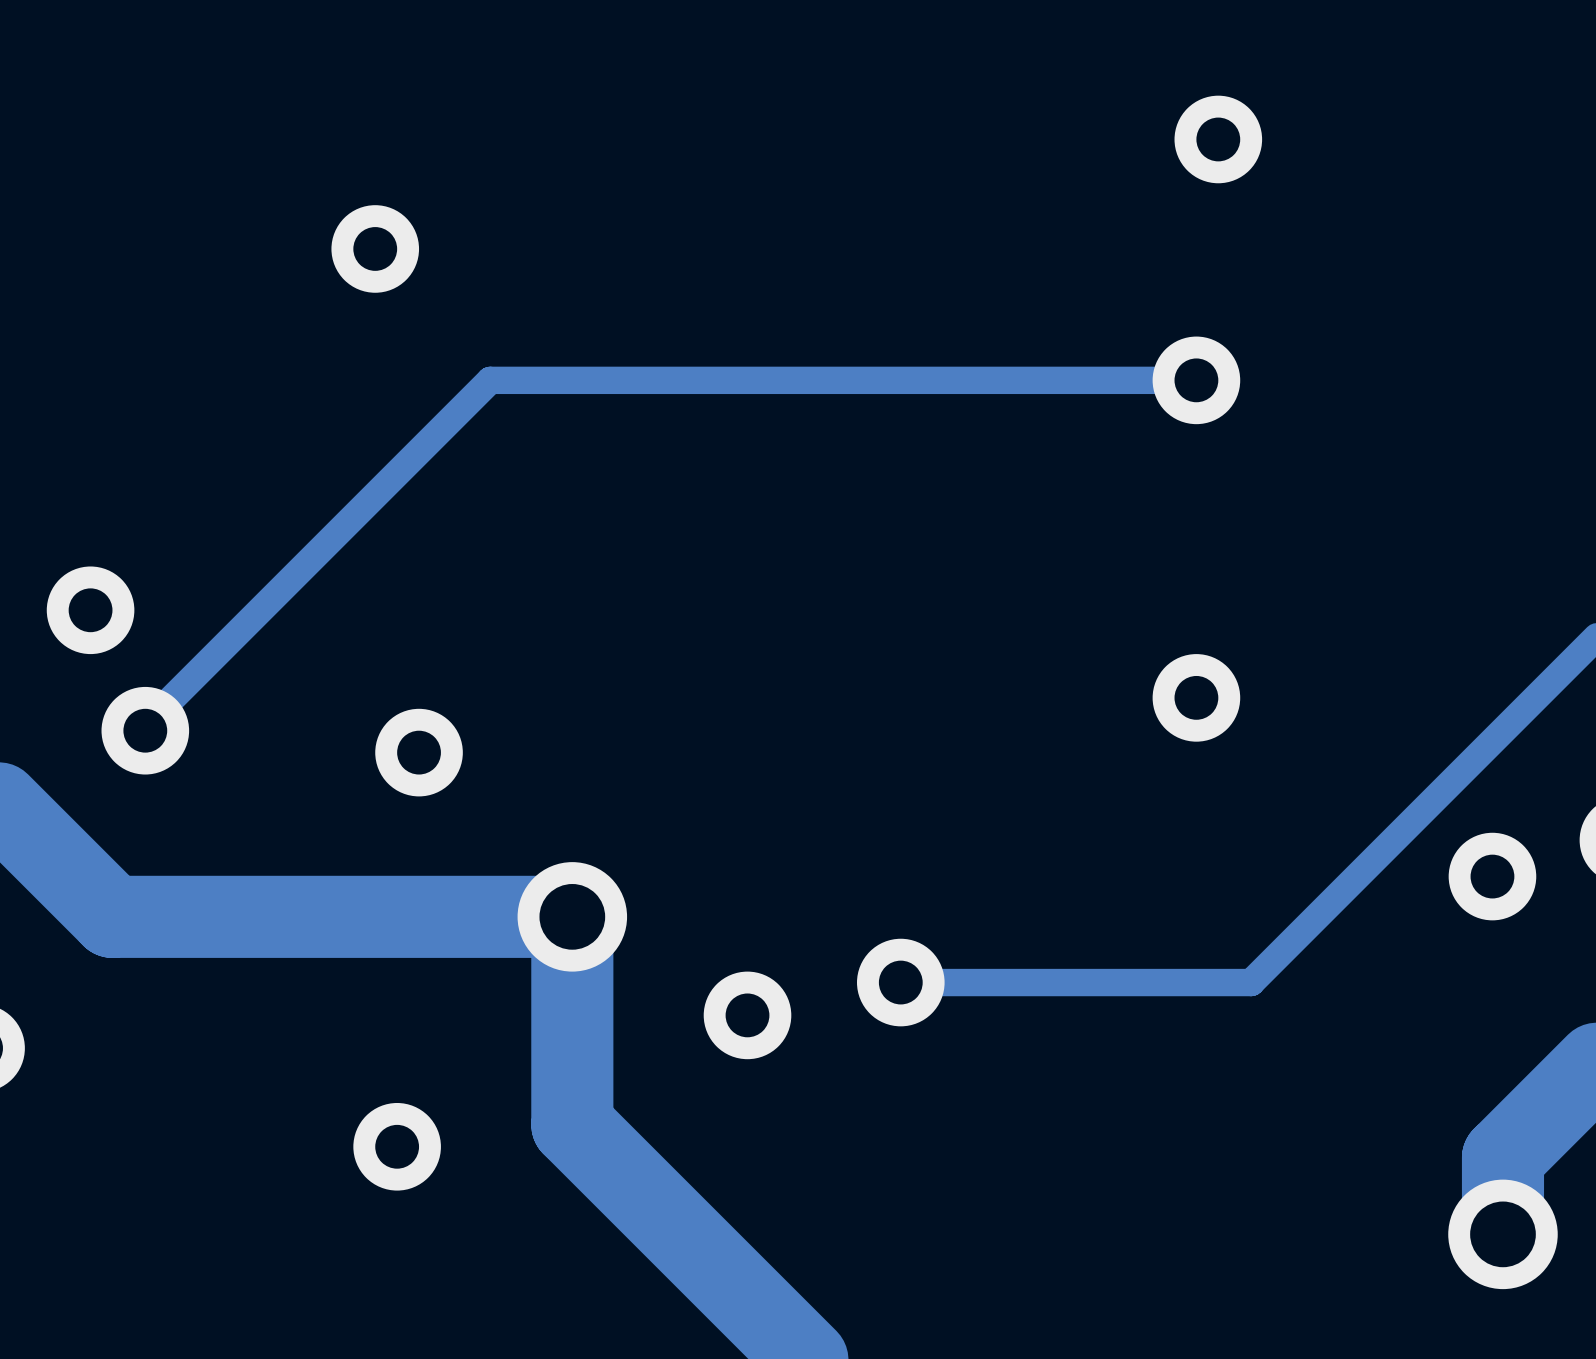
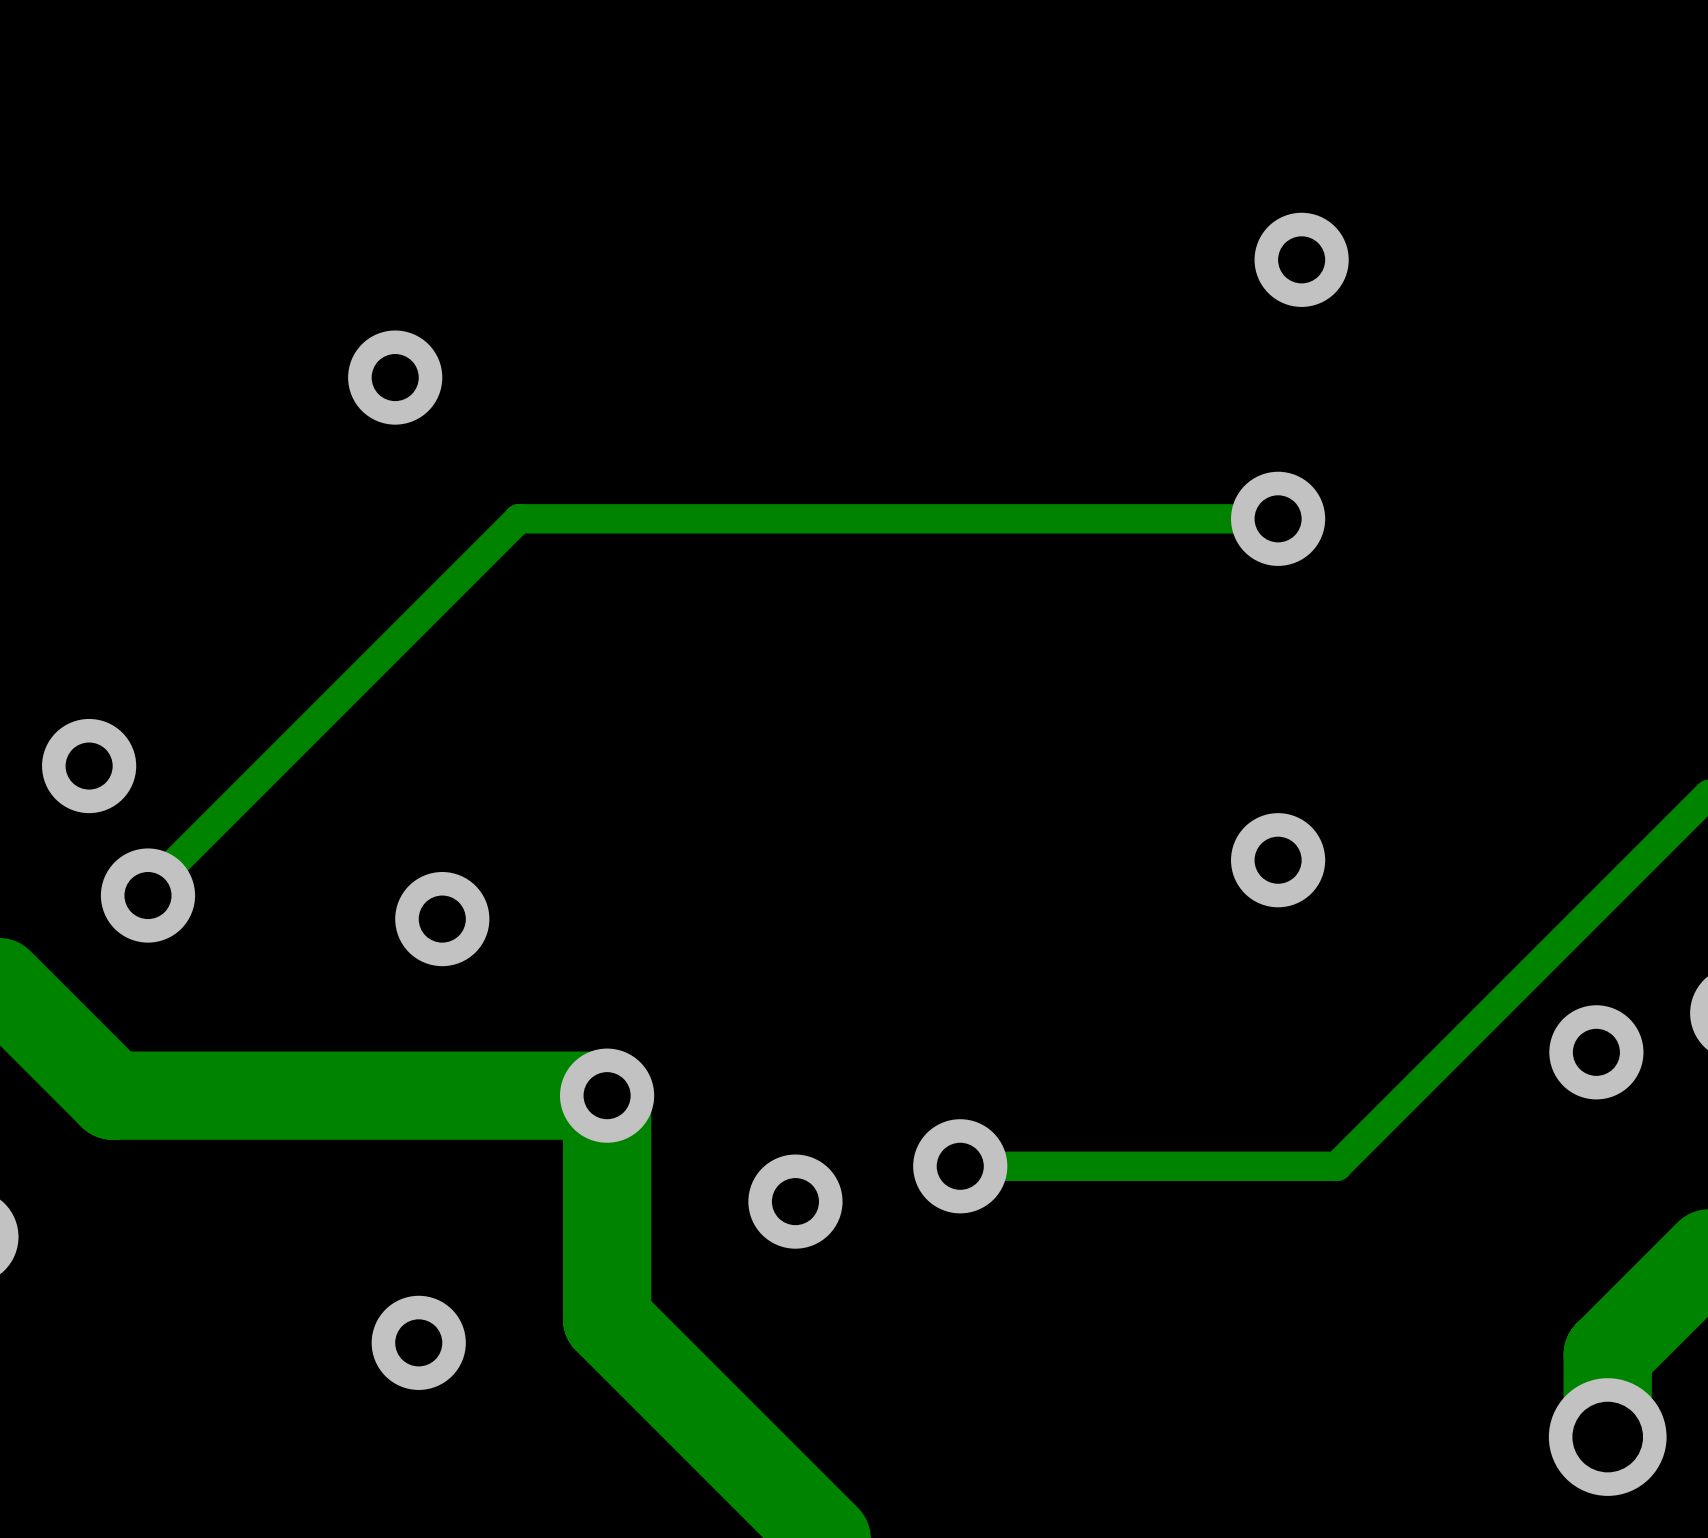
via size: [517, 862, 628, 972] -> [560, 1048, 655, 1143]

